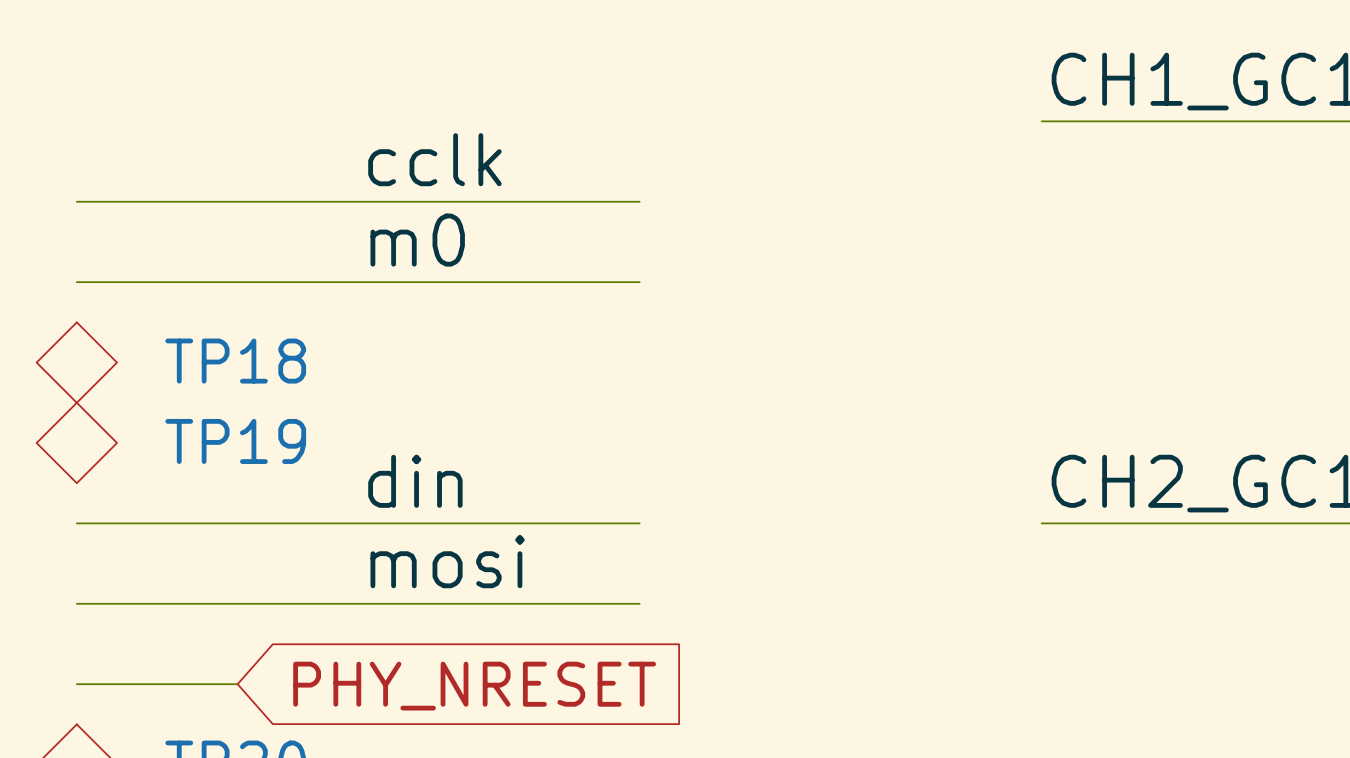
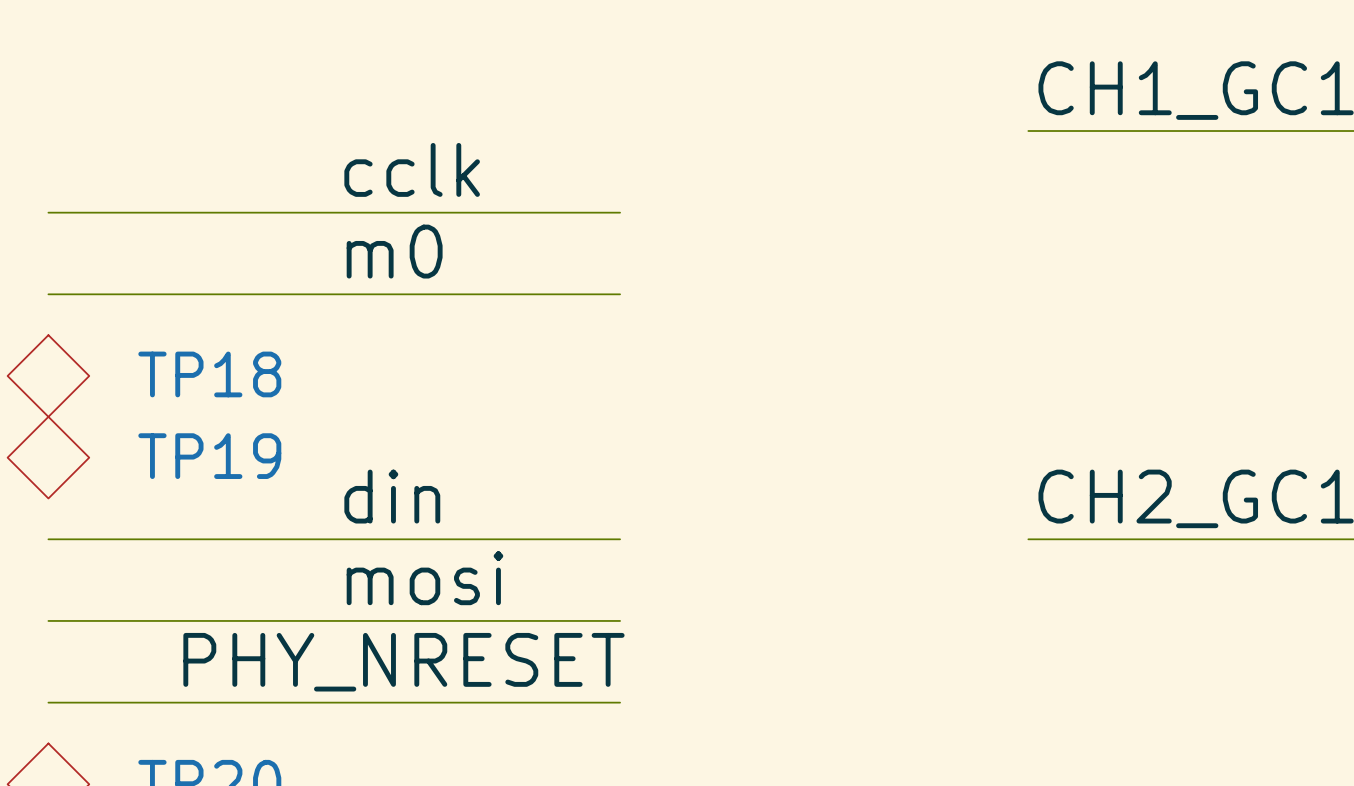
label: none -> PHY_NRESET (403, 662)
wire: none -> (211, 702) (620, 702)
global label: PHY_NRESET (474, 686) -> none

